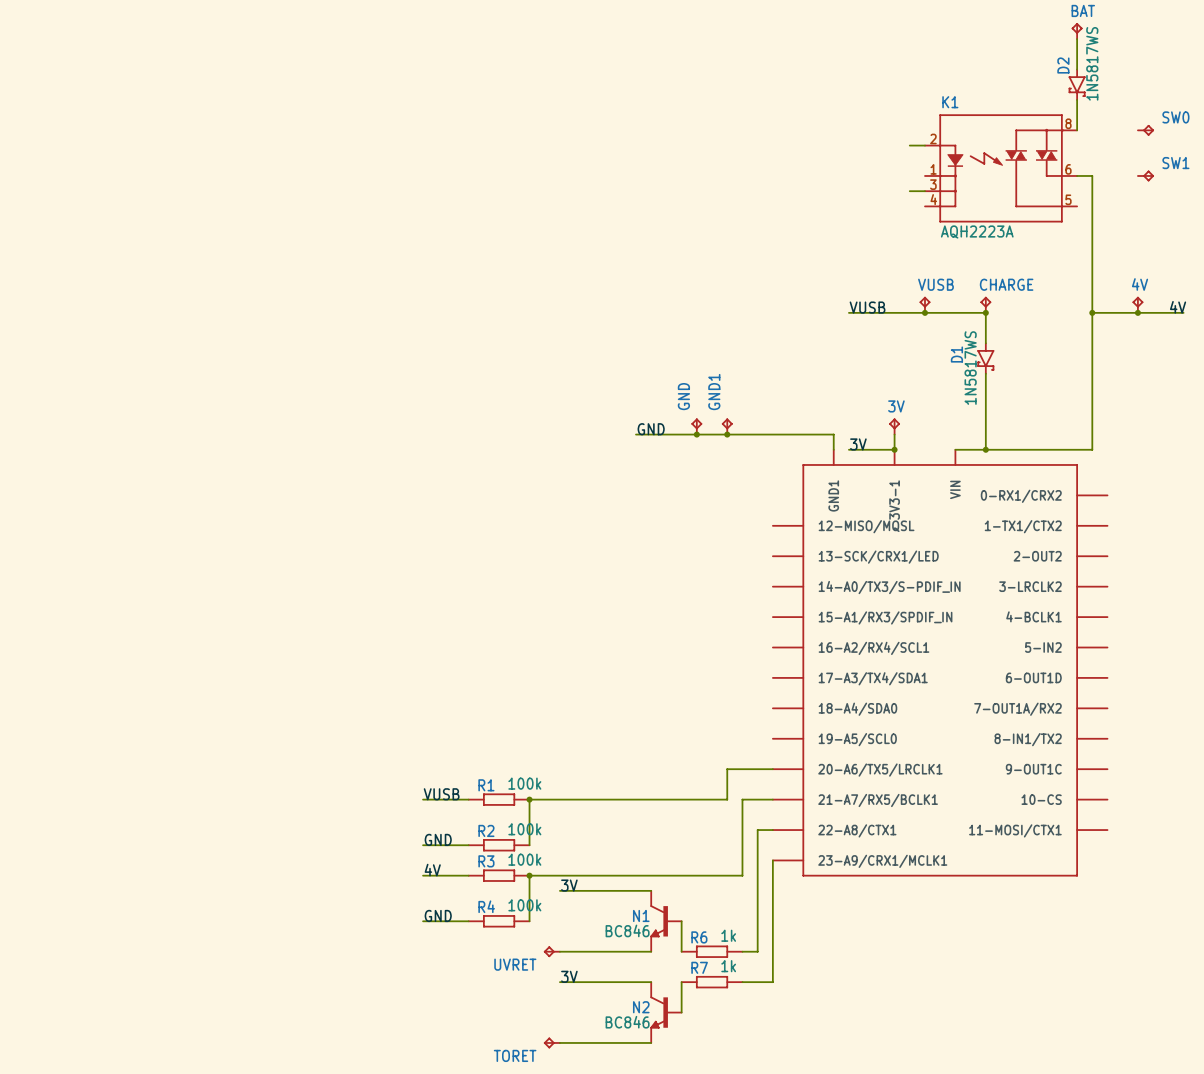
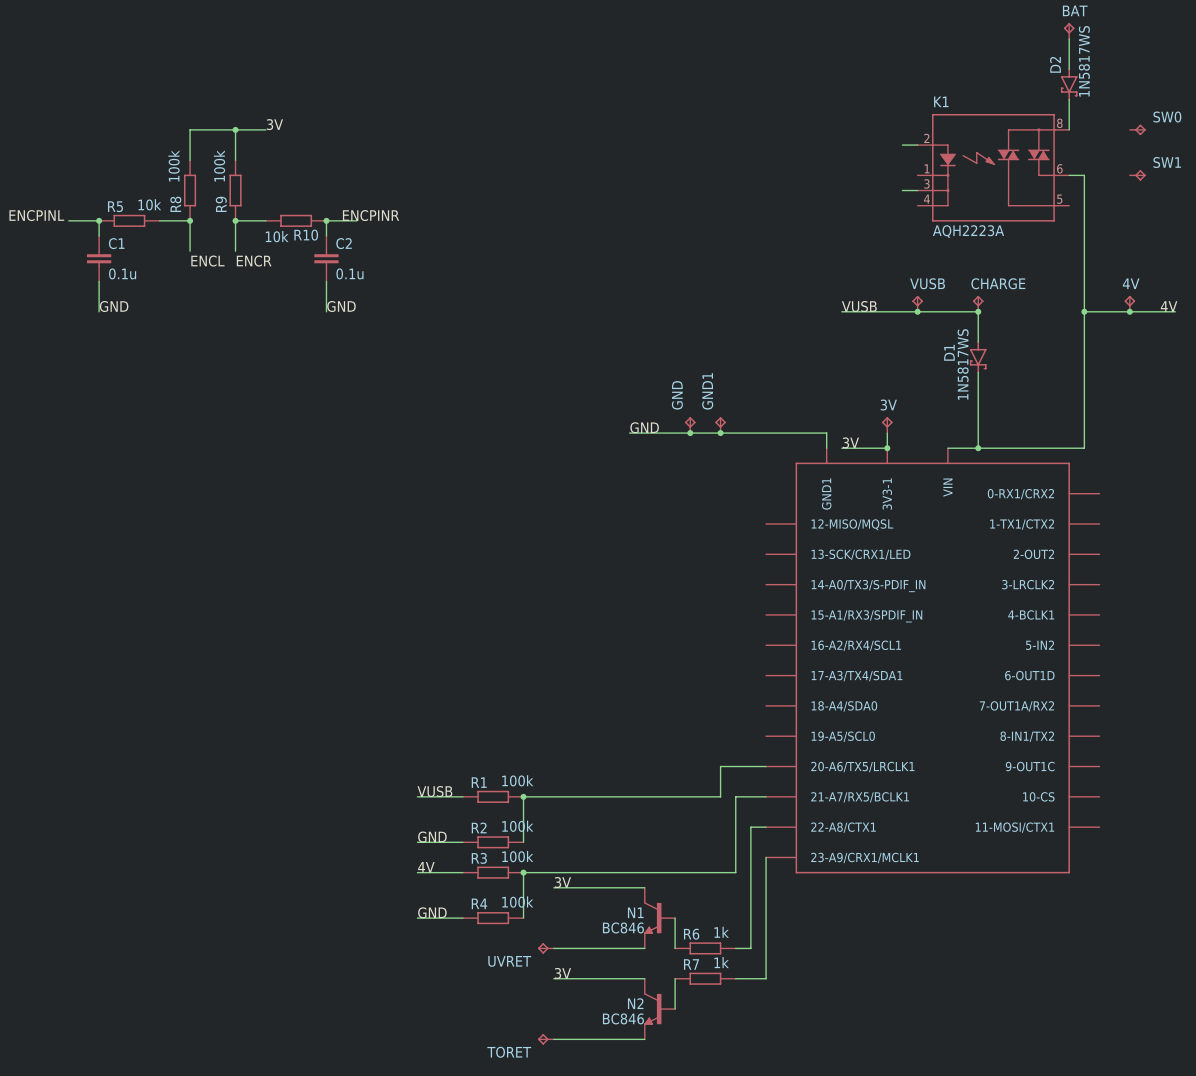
label: none -> 3V (274, 124)
wire: none -> (235, 129) (235, 160)
junction: none -> (235, 129)
wire: none -> (265, 129) (190, 129) (190, 160)
R8: none -> 100k (190, 190)
R9: none -> 100k (235, 190)
label: none -> ENCPINL (36, 215)
label: none -> ENCPINR (371, 215)
wire: none -> (68, 220) (99, 220) (99, 236)
junction: none -> (99, 220)
R5: none -> 10k (129, 220)
wire: none -> (159, 220) (190, 220) (190, 251)
junction: none -> (190, 220)
junction: none -> (235, 220)
wire: none -> (265, 220) (235, 220) (235, 251)
R10: none -> 10k (296, 220)
junction: none -> (326, 220)
wire: none -> (356, 220) (326, 220) (326, 236)
C1: none -> 0.1u (99, 258)
C2: none -> 0.1u (326, 258)
label: none -> ENCL (207, 261)
label: none -> ENCR (254, 261)
wire: none -> (99, 281) (99, 311)
wire: none -> (326, 281) (326, 311)
label: none -> GND (114, 306)
label: none -> GND (341, 306)

